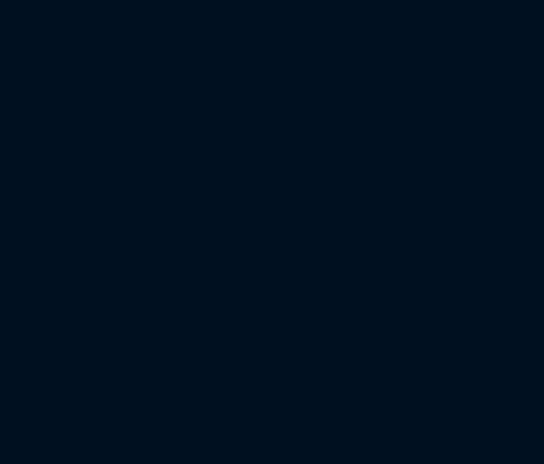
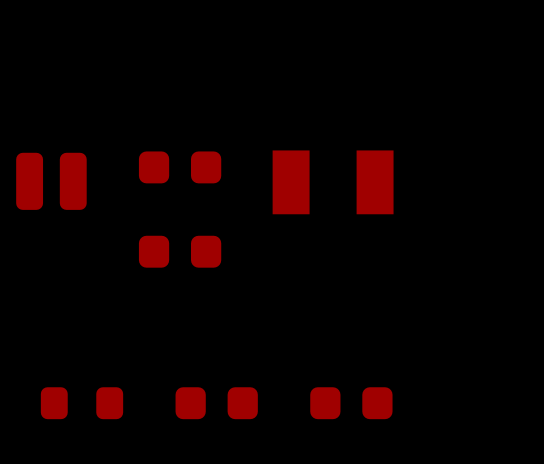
part: none -> (180, 167)
part: none -> (51, 181)
part: none -> (333, 182)
part: none -> (180, 251)
part: none -> (82, 403)
part: none -> (216, 403)
part: none -> (351, 403)

